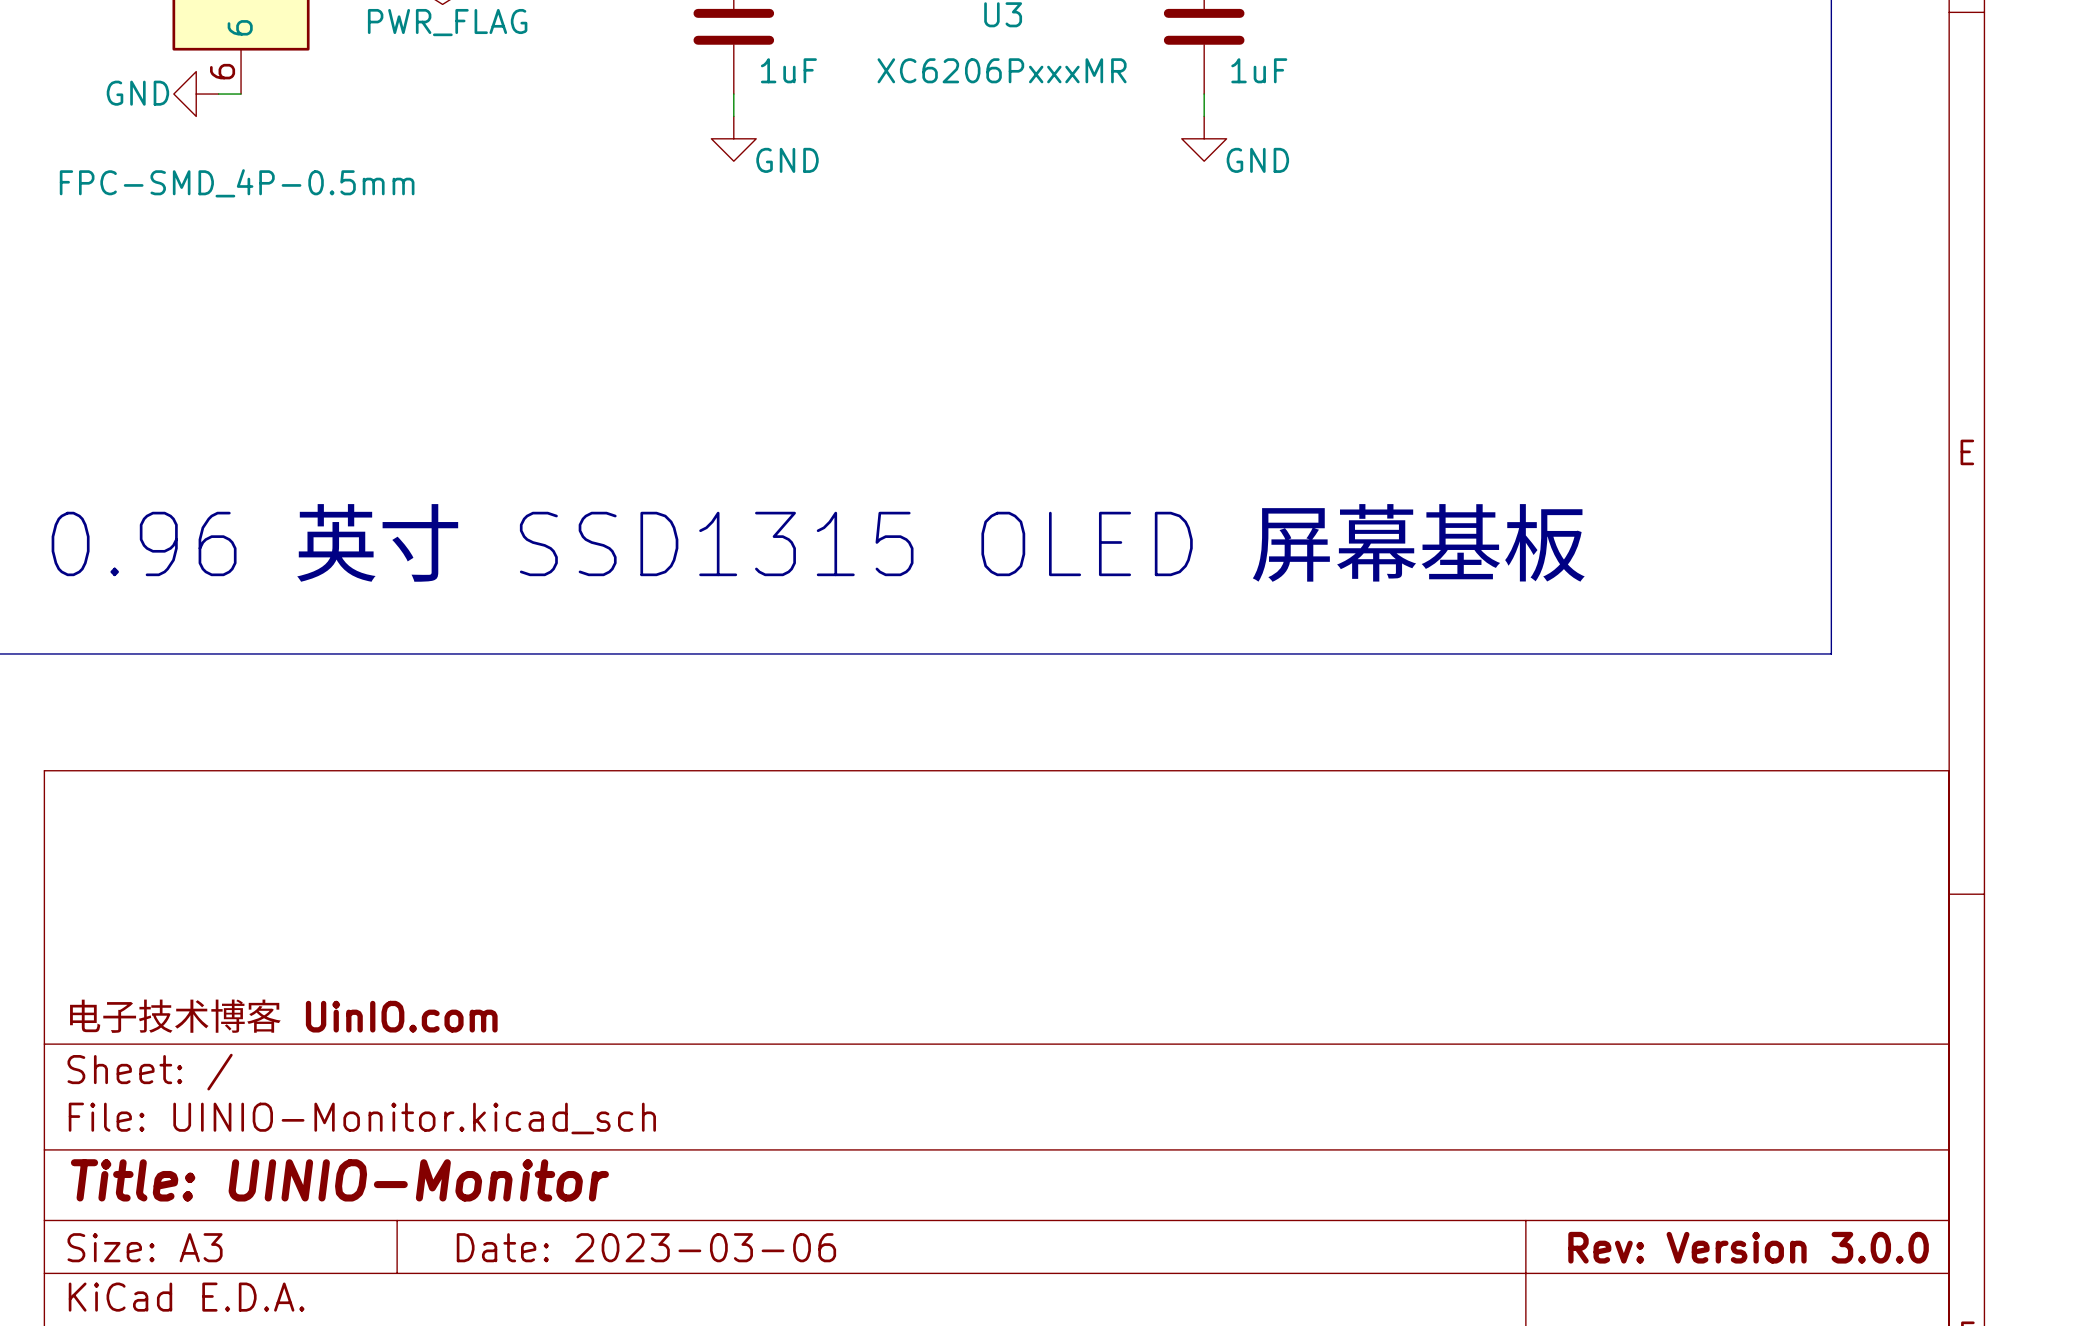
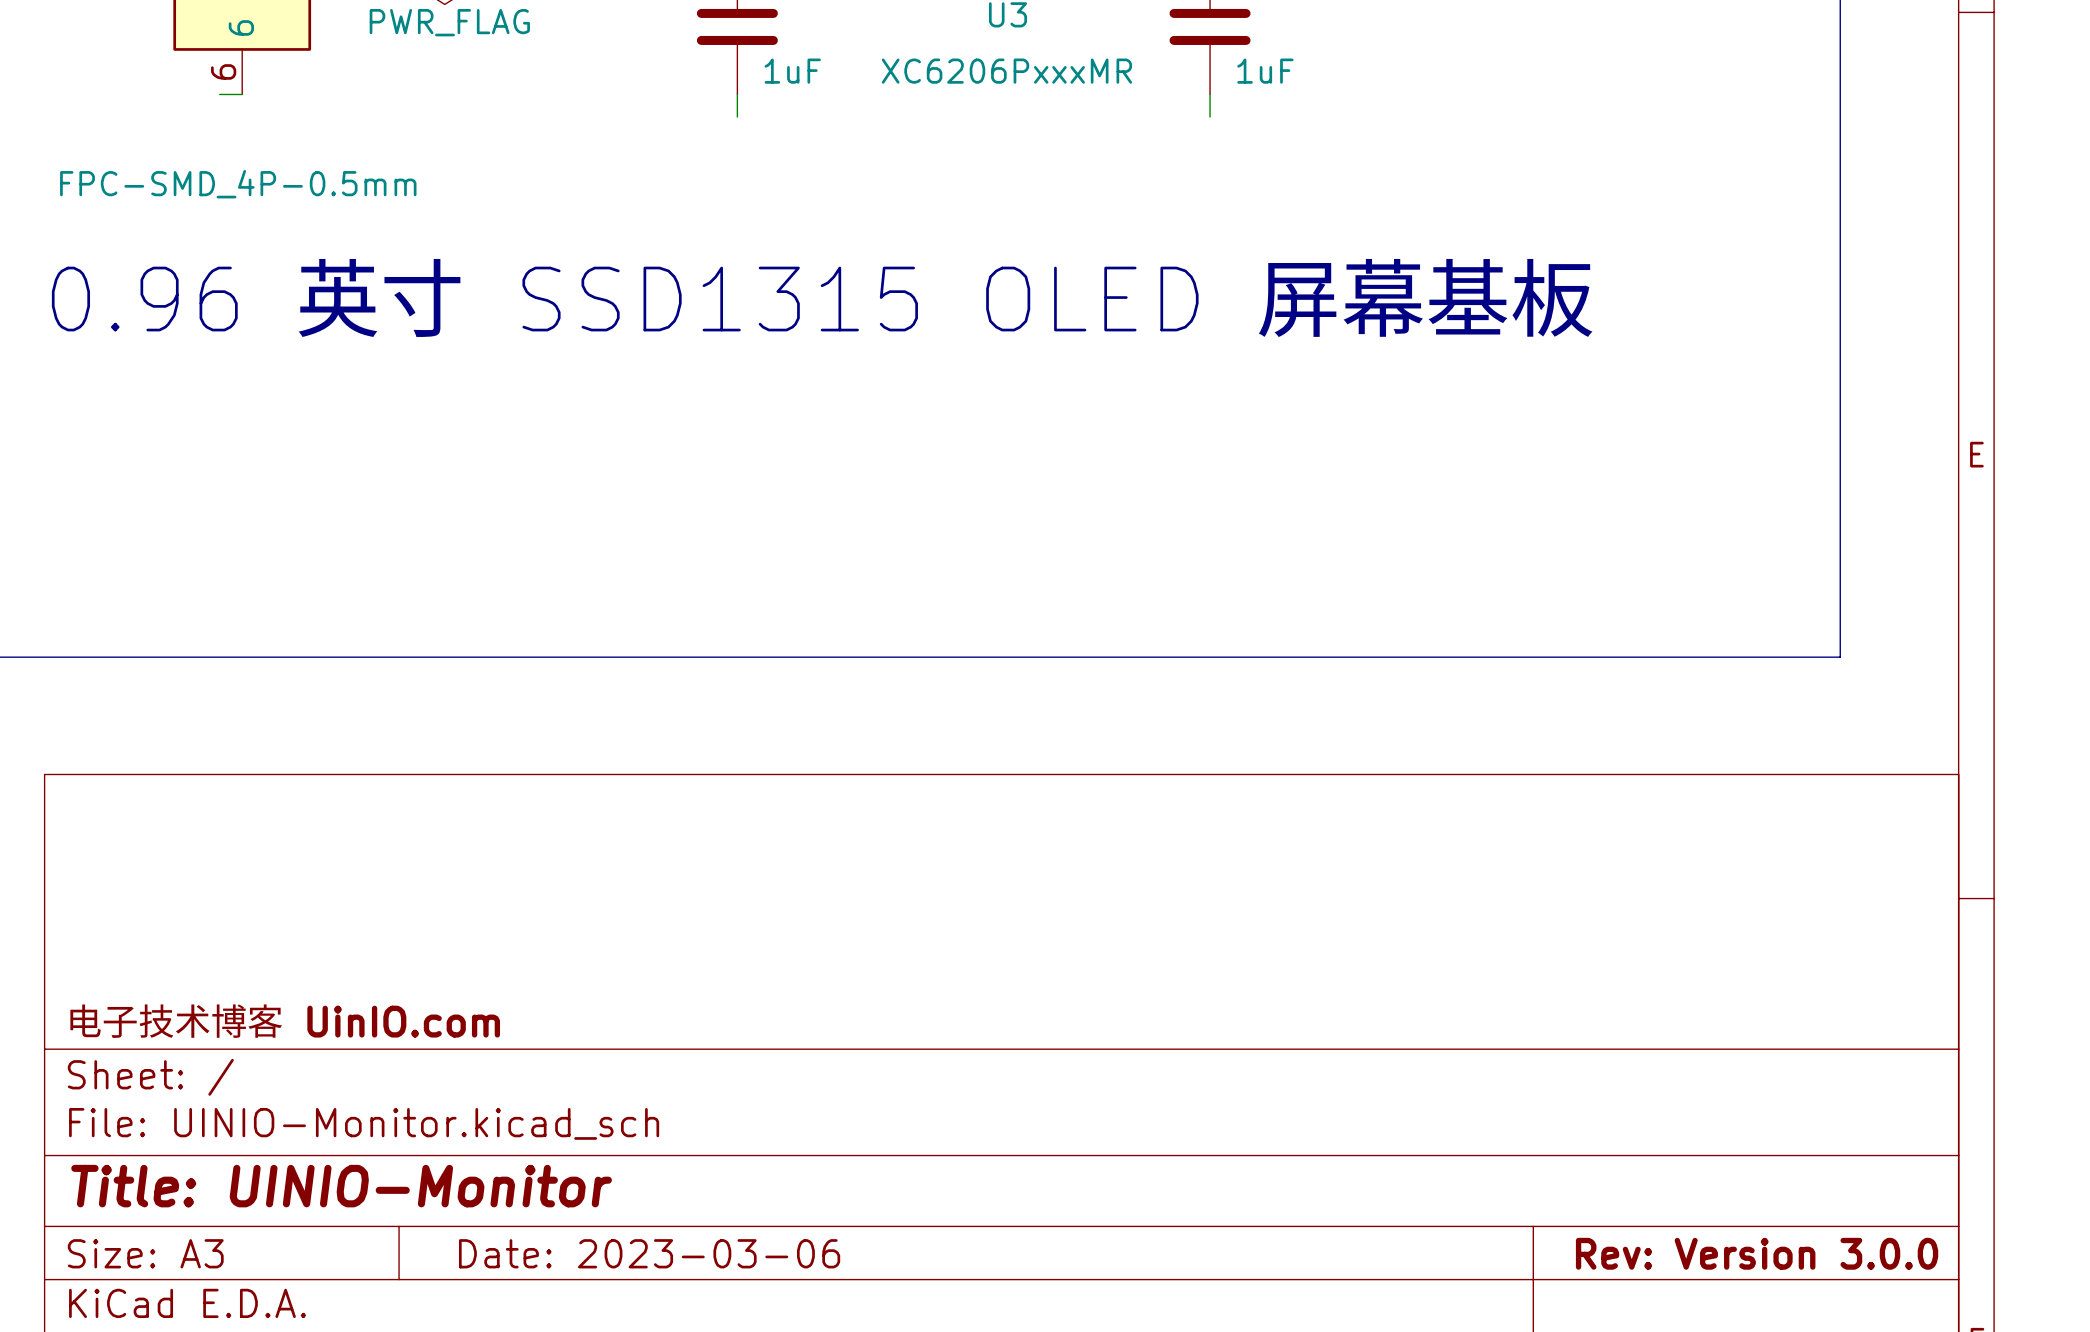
power symbol: GND (196, 94) -> none
power symbol: GND (733, 138) -> none
power symbol: GND (1204, 138) -> none
text position: 0.96 英寸 SSD1315 OLED 屏幕基板 (818, 542) -> 0.96 英寸 SSD1315 OLED 屏幕基板 (822, 298)

